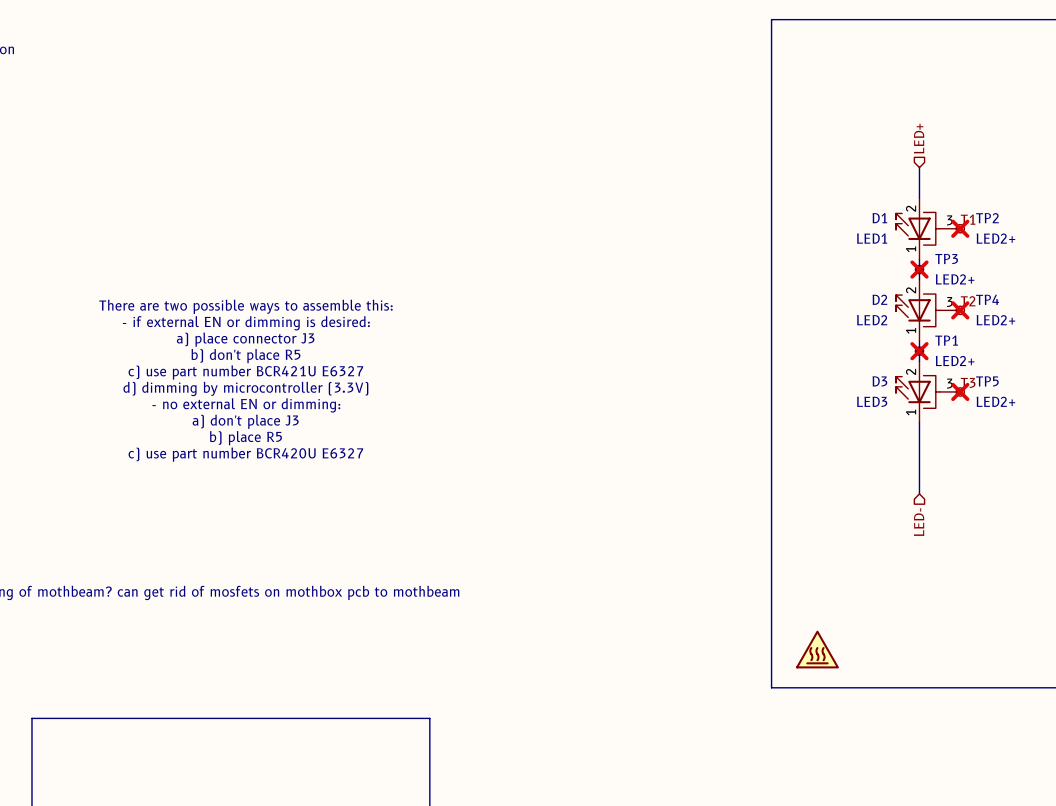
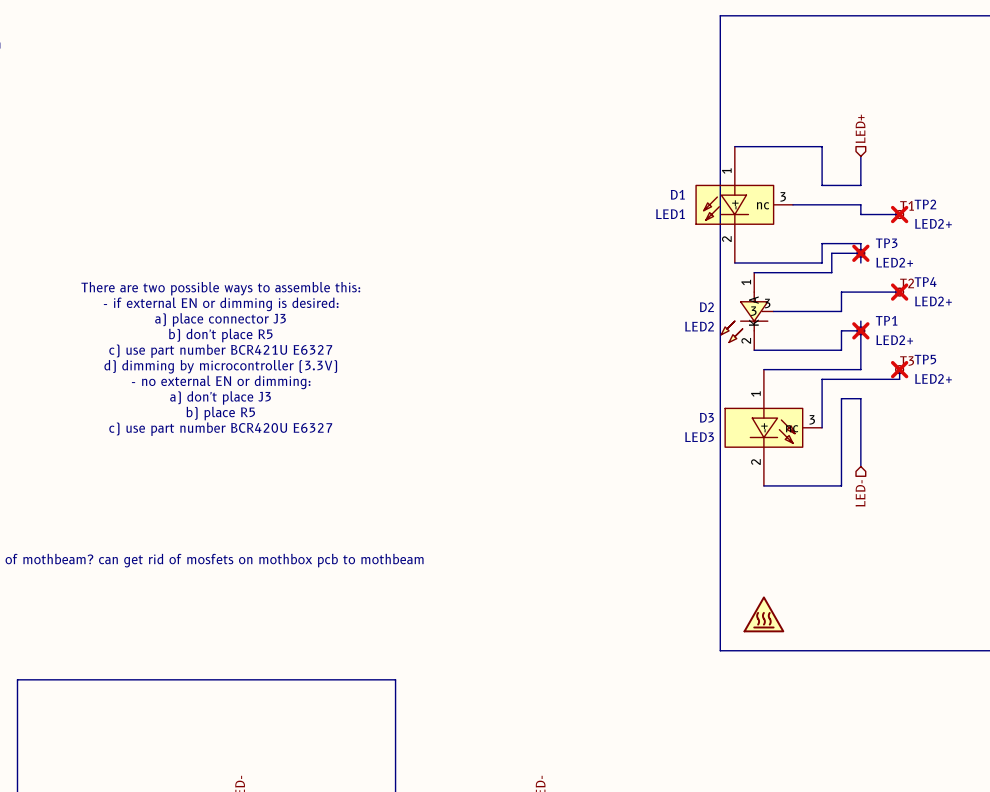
wire: none -> (734, 146) (822, 146) (822, 185) (860, 185)
D1 symbol: [896, 198, 961, 260] -> [696, 146, 794, 263]
wire: none -> (793, 204) (860, 204) (860, 214) (899, 214)
D1 name position: D1 (879, 218) -> D1 (677, 194)
D1 value position: LED1 (872, 238) -> LED1 (670, 214)
wire: none -> (860, 243) (822, 243) (822, 262) (734, 262)
wire: none -> (860, 253) (831, 253) (831, 272) (754, 272)
D2 symbol: [896, 279, 961, 341] -> [721, 272, 774, 351]
wire: none -> (899, 292) (841, 292) (841, 311) (773, 311)
wire: none -> (860, 330) (841, 330) (841, 350) (754, 350)
D3 symbol: [896, 361, 961, 423] -> [725, 369, 823, 486]
wire: none -> (860, 340) (860, 369) (763, 369)
D3 name position: D3 (879, 381) -> D3 (706, 417)
wire: none -> (899, 369) (899, 379) (822, 379) (822, 427)
D3 value position: LED3 (872, 401) -> LED3 (699, 437)
wire: none -> (860, 398) (841, 398) (841, 485) (763, 485)

